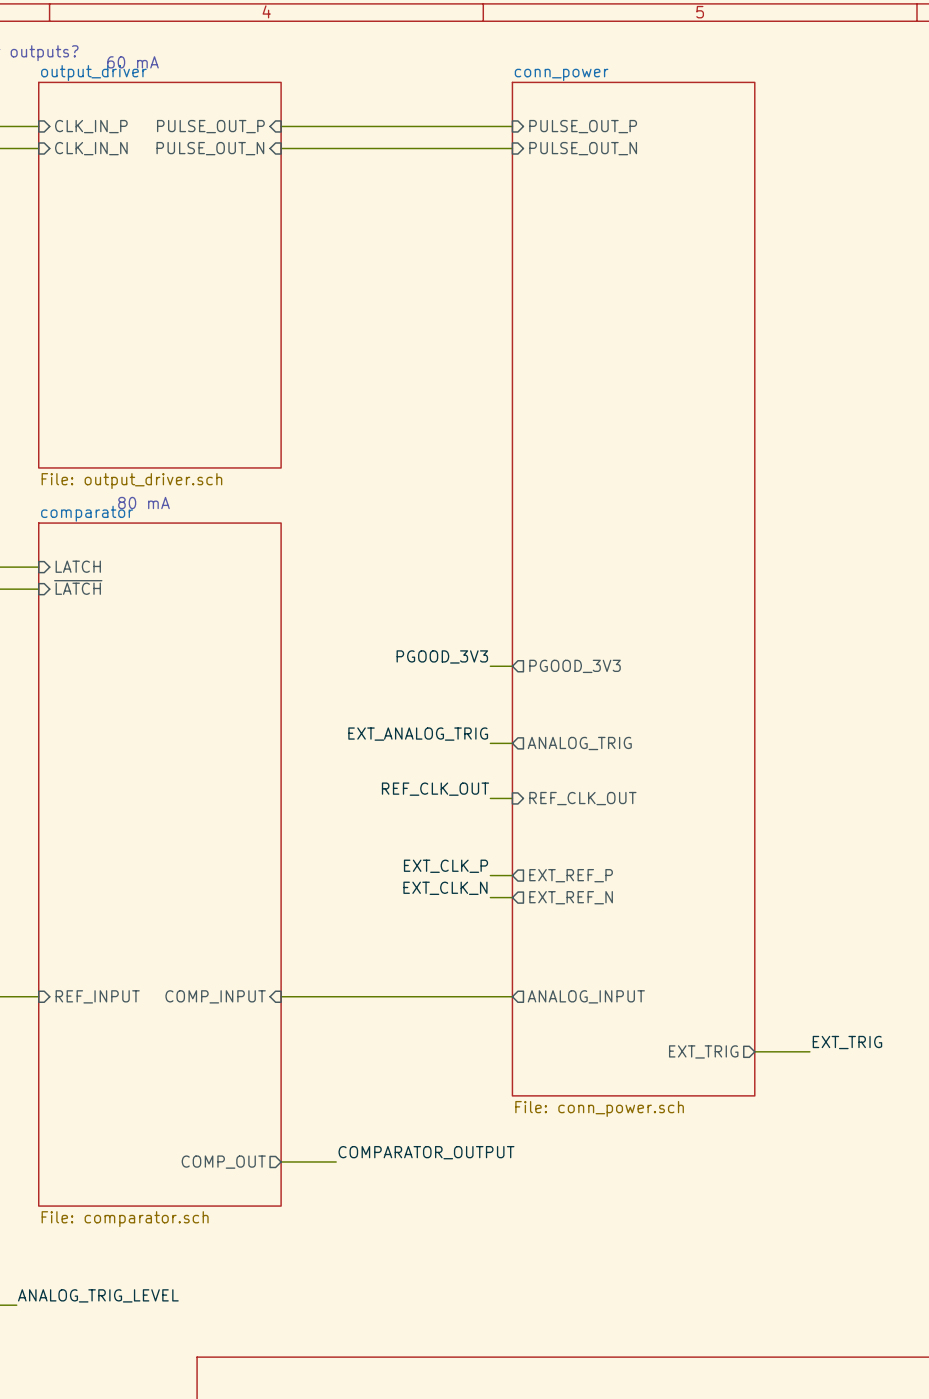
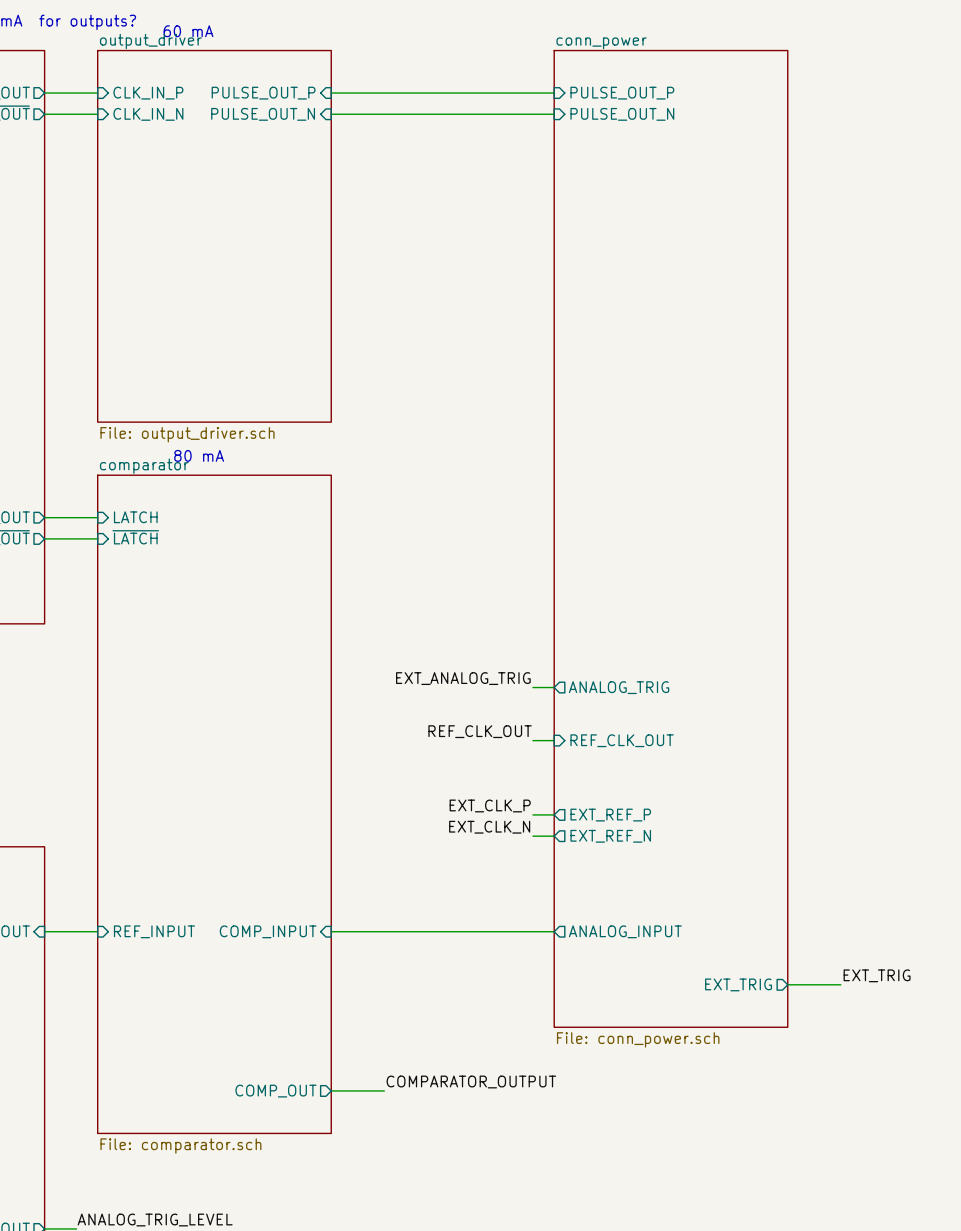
label: PGOOD_3V3 (442, 656) -> none
wire: (490, 666) (512, 666) -> none
sheet pin: PGOOD_3V3 (575, 666) -> none

